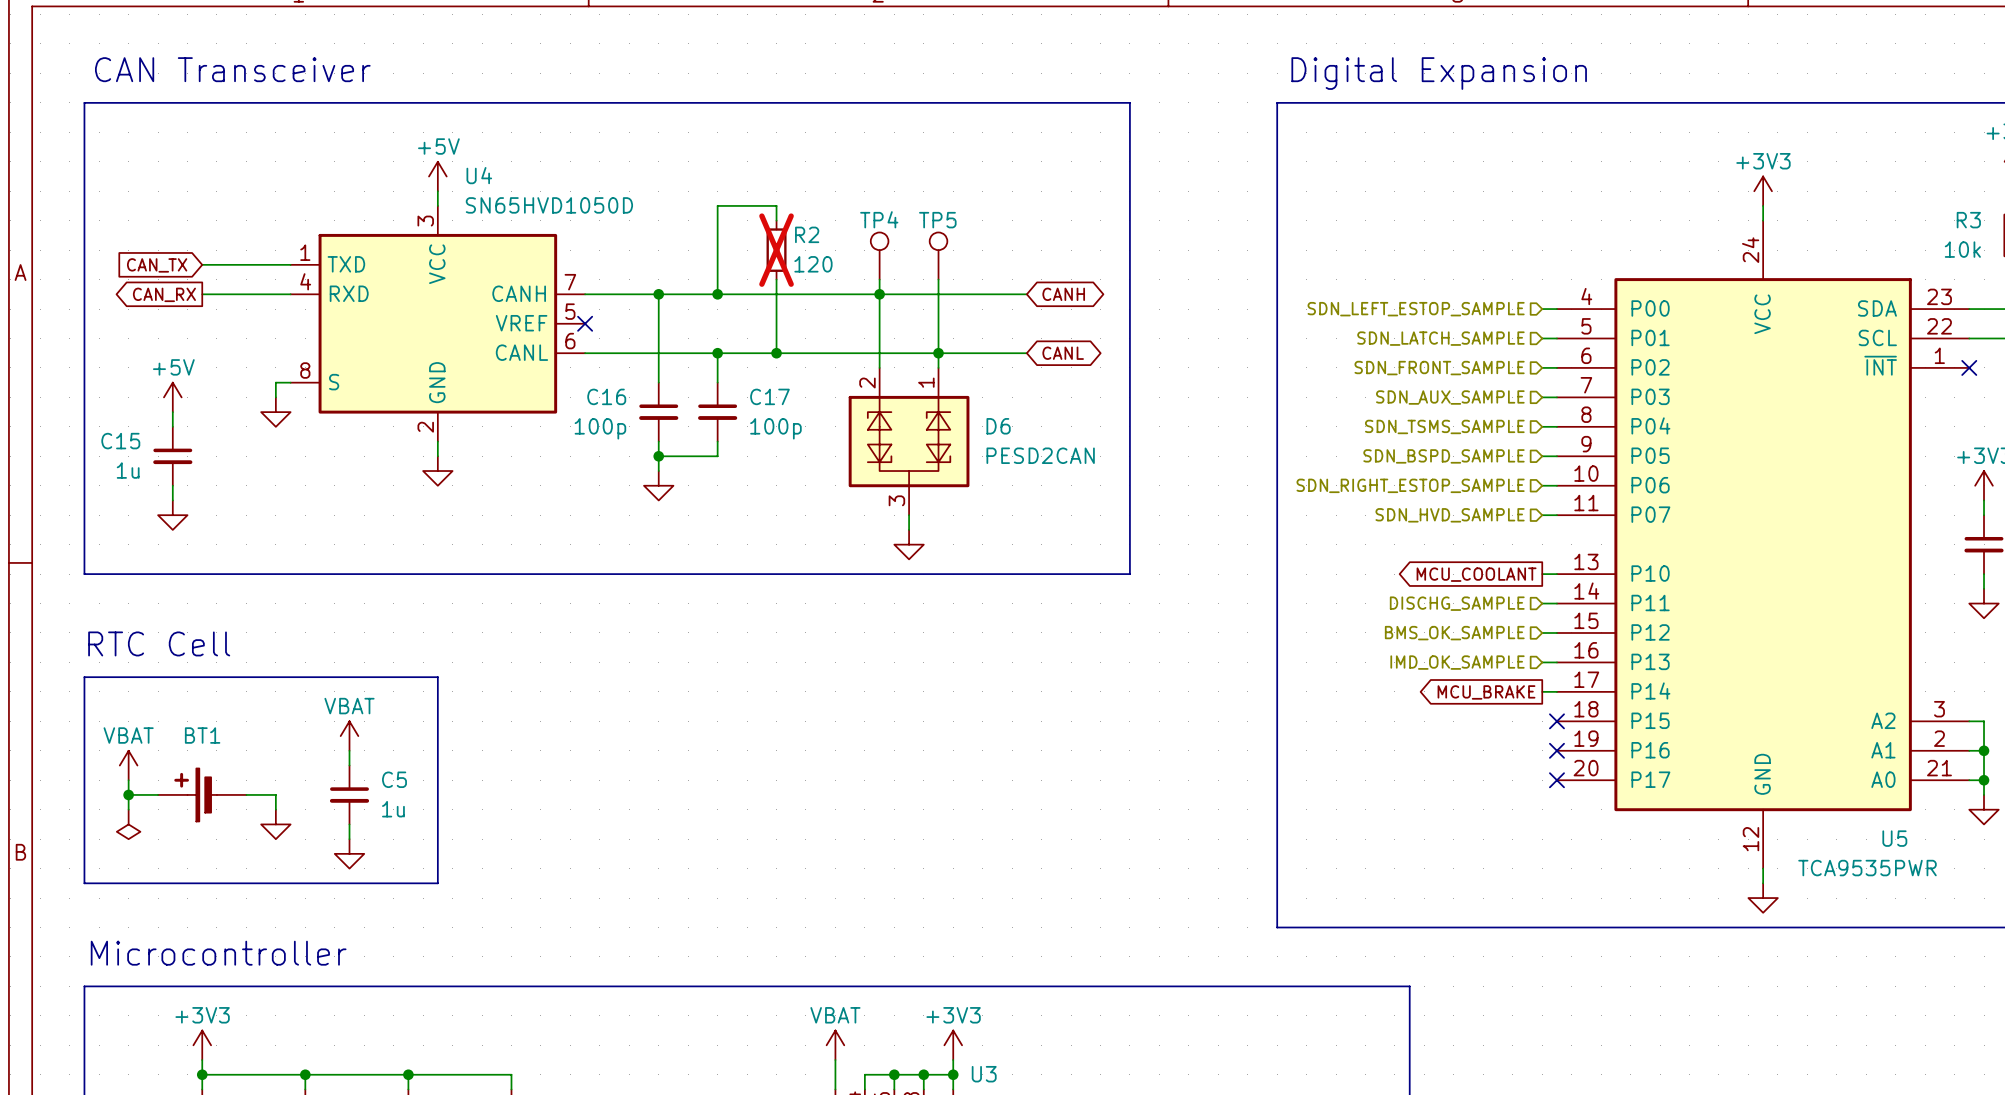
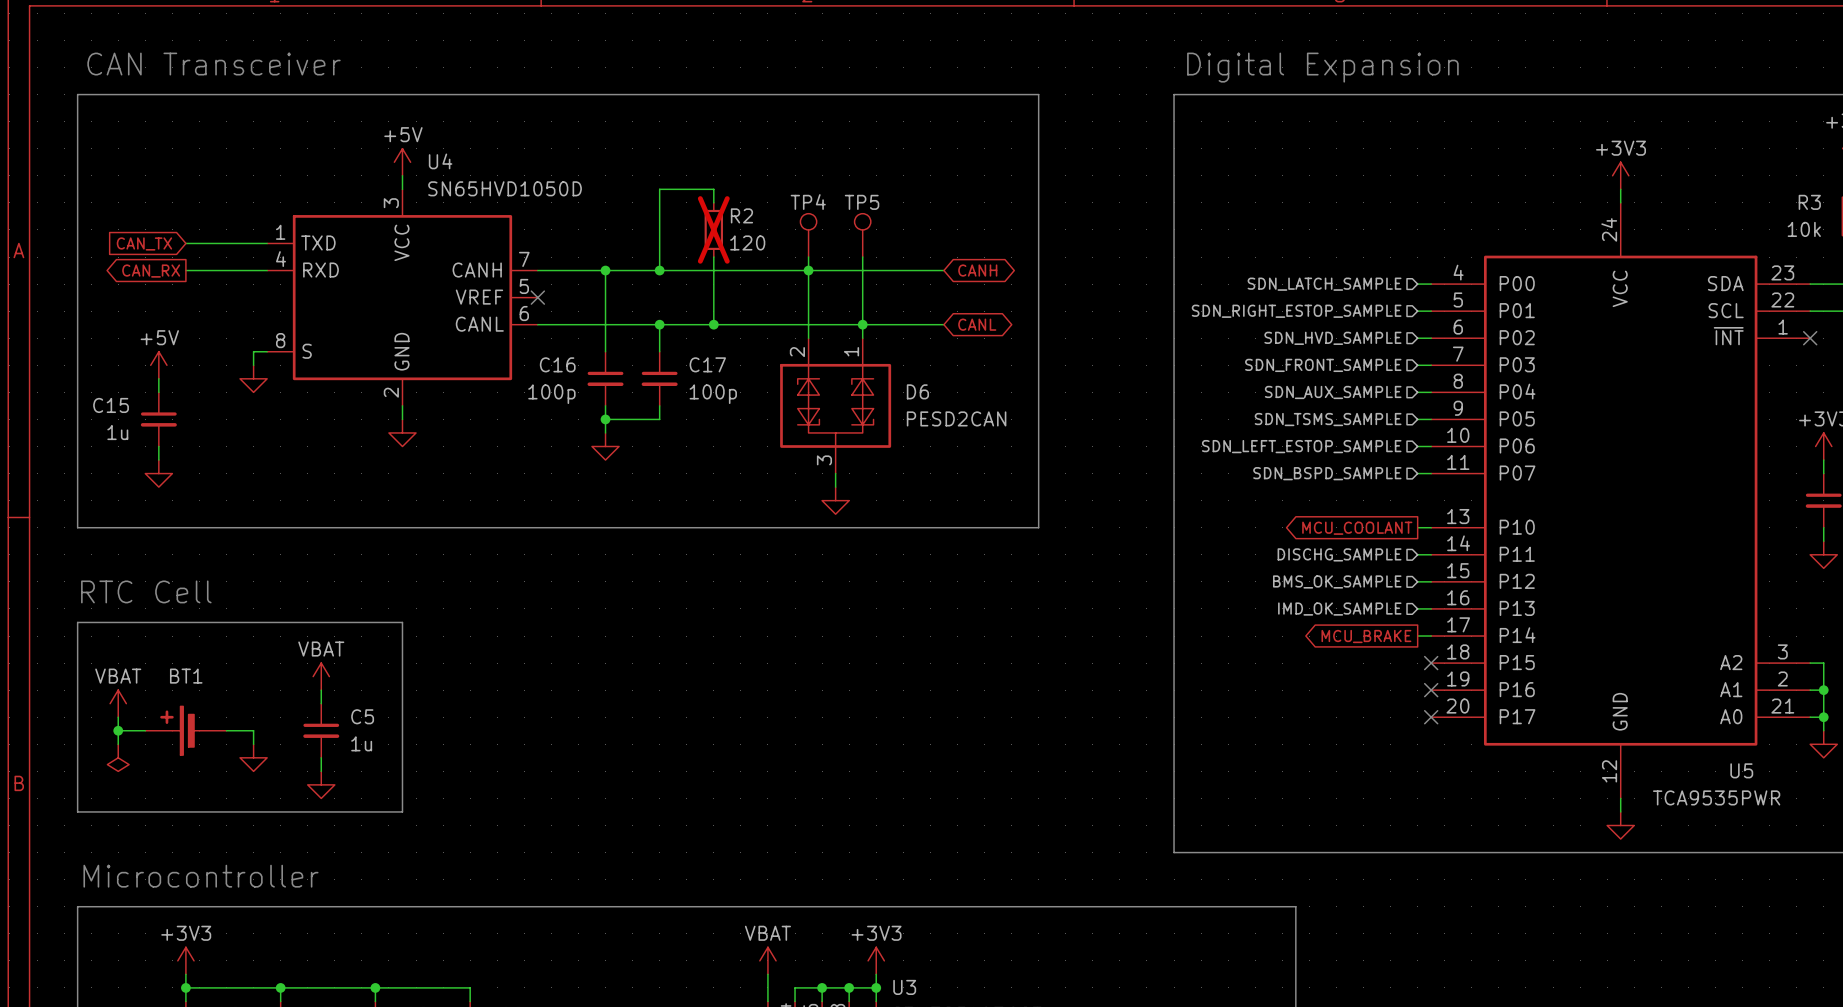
hierarchical label: SDN_LEFT_ESTOP_SAMPLE (1416, 309) -> SDN_LATCH_SAMPLE (1324, 284)
hierarchical label: SDN_LATCH_SAMPLE (1440, 338) -> SDN_RIGHT_ESTOP_SAMPLE (1296, 311)
hierarchical label: SDN_FRONT_SAMPLE (1439, 368) -> SDN_HVD_SAMPLE (1332, 338)
hierarchical label: SDN_AUX_SAMPLE (1450, 397) -> SDN_FRONT_SAMPLE (1323, 365)
hierarchical label: SDN_TSMS_SAMPLE (1444, 426) -> SDN_AUX_SAMPLE (1333, 392)
hierarchical label: SDN_BSPD_SAMPLE (1443, 456) -> SDN_TSMS_SAMPLE (1328, 419)
hierarchical label: SDN_RIGHT_ESTOP_SAMPLE (1410, 485) -> SDN_LEFT_ESTOP_SAMPLE (1301, 446)
hierarchical label: SDN_HVD_SAMPLE (1450, 515) -> SDN_BSPD_SAMPLE (1327, 473)

